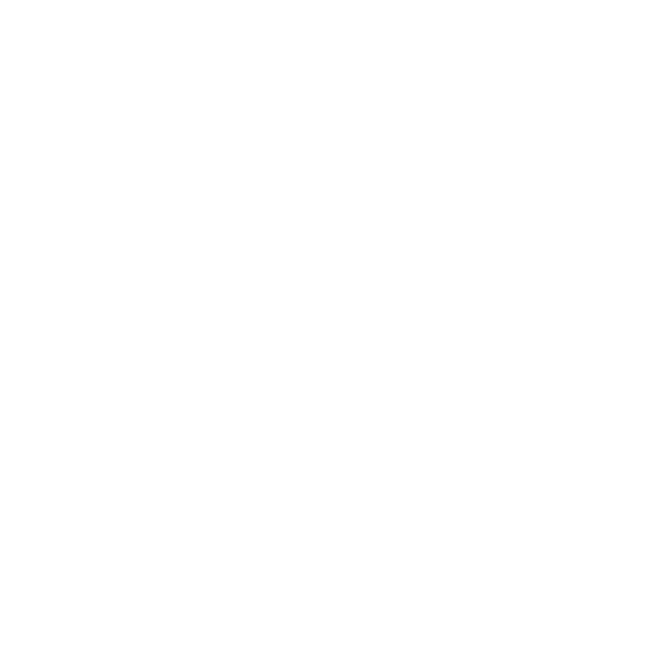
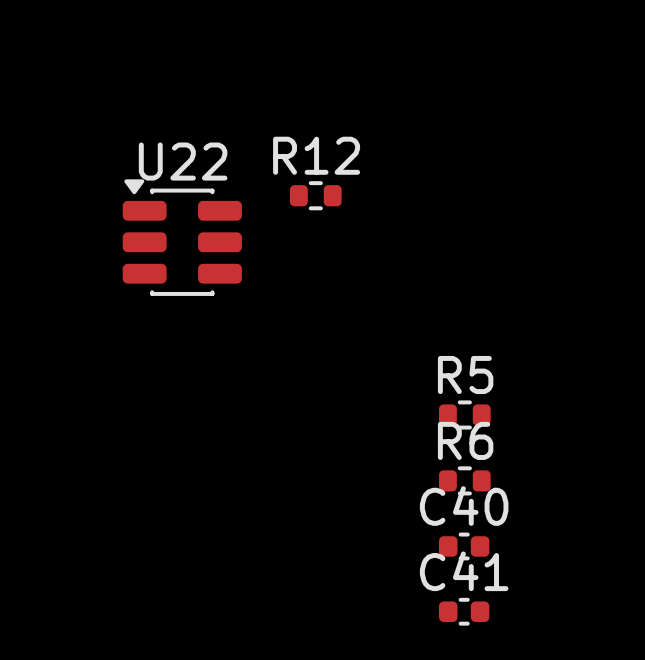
R12: none -> (315, 195)
U22: none -> (182, 237)
R5: none -> (464, 414)
R6: none -> (464, 480)
C40: none -> (464, 546)
C41: none -> (464, 611)

